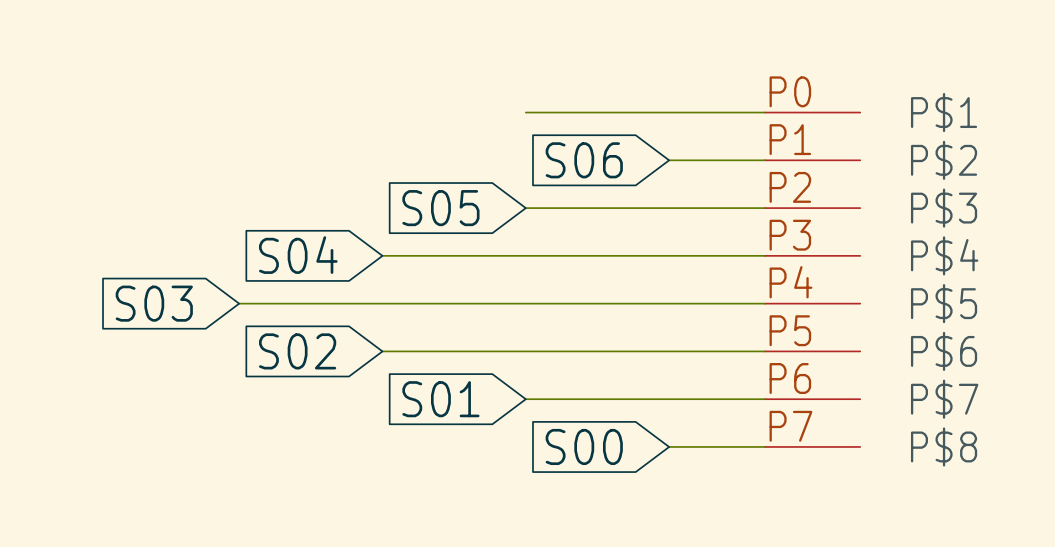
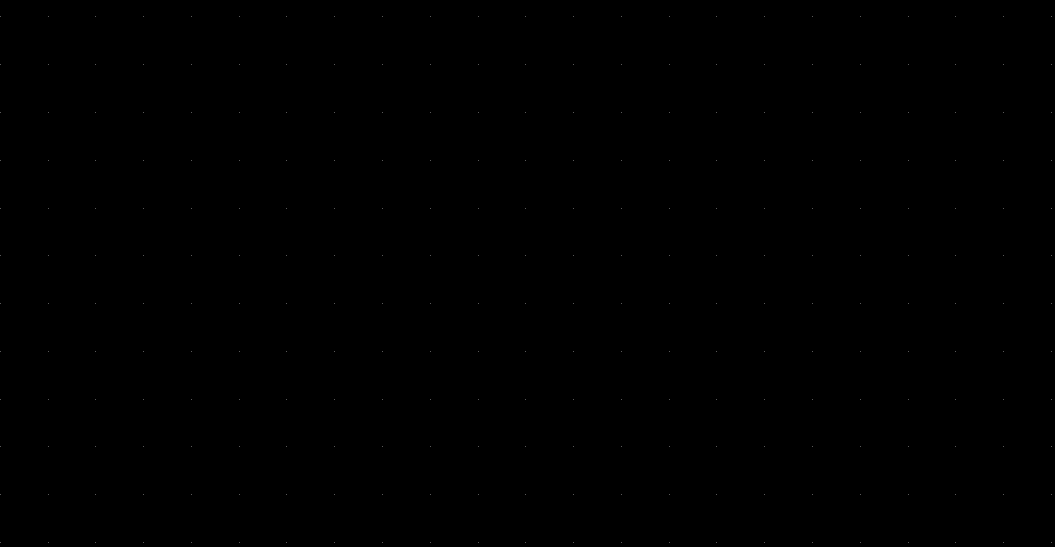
wire: (525, 112) (764, 112) -> none
global label: S06 (584, 160) -> none
wire: (669, 160) (764, 160) -> none
global label: S05 (440, 208) -> none
wire: (525, 208) (764, 208) -> none
global label: S04 (298, 255) -> none
wire: (382, 255) (764, 255) -> none
part: (812, 279) -> none
global label: S03 (154, 303) -> none
wire: (239, 303) (764, 303) -> none
global label: S02 (297, 351) -> none
wire: (382, 351) (764, 351) -> none
global label: S01 (440, 399) -> none
wire: (525, 399) (764, 399) -> none
global label: S00 (584, 446) -> none
wire: (669, 446) (764, 446) -> none

